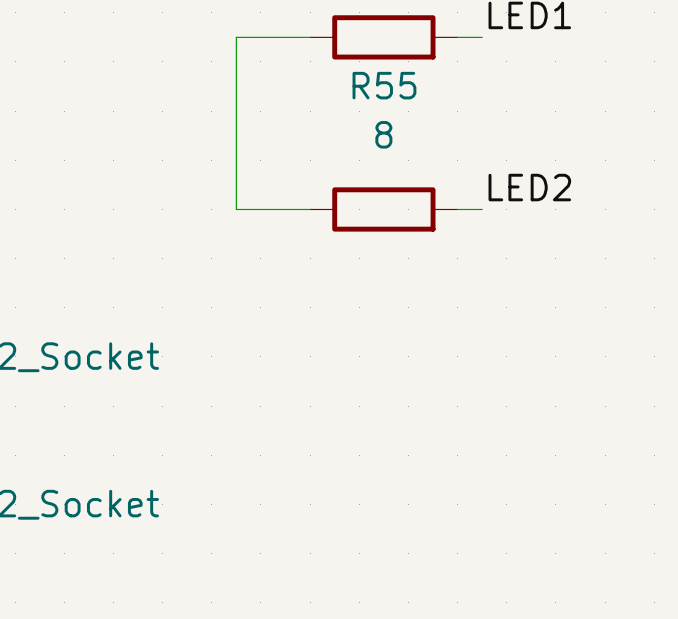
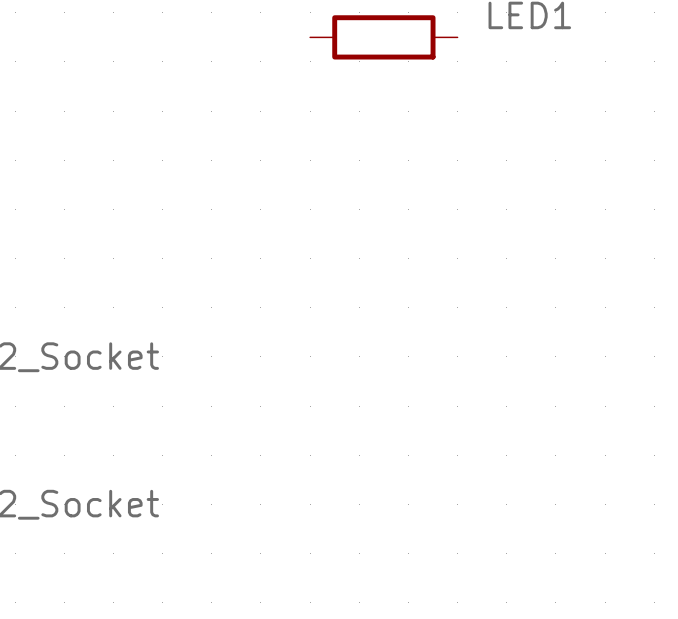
wire: (310, 37) (236, 37) (236, 209) (310, 209) -> none
wire: (457, 37) (482, 37) -> none
label: LED2 (529, 187) -> none
R55: 8 (383, 209) -> none
wire: (457, 209) (482, 209) -> none

